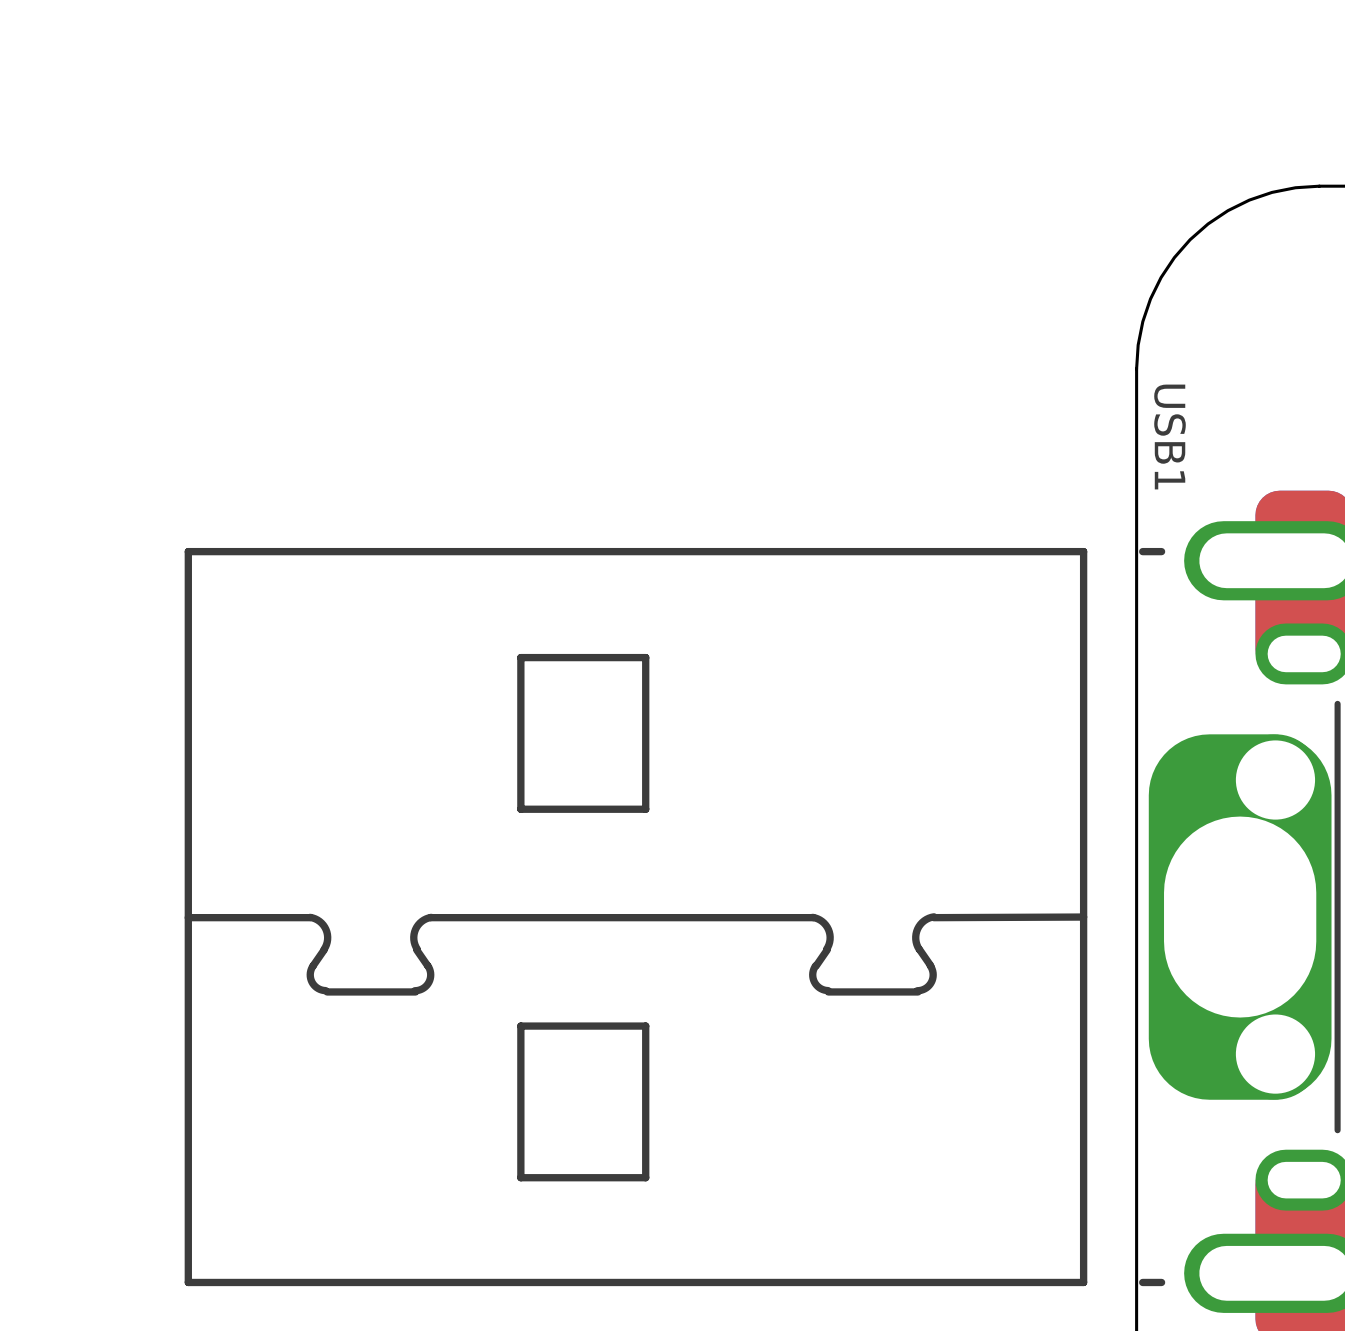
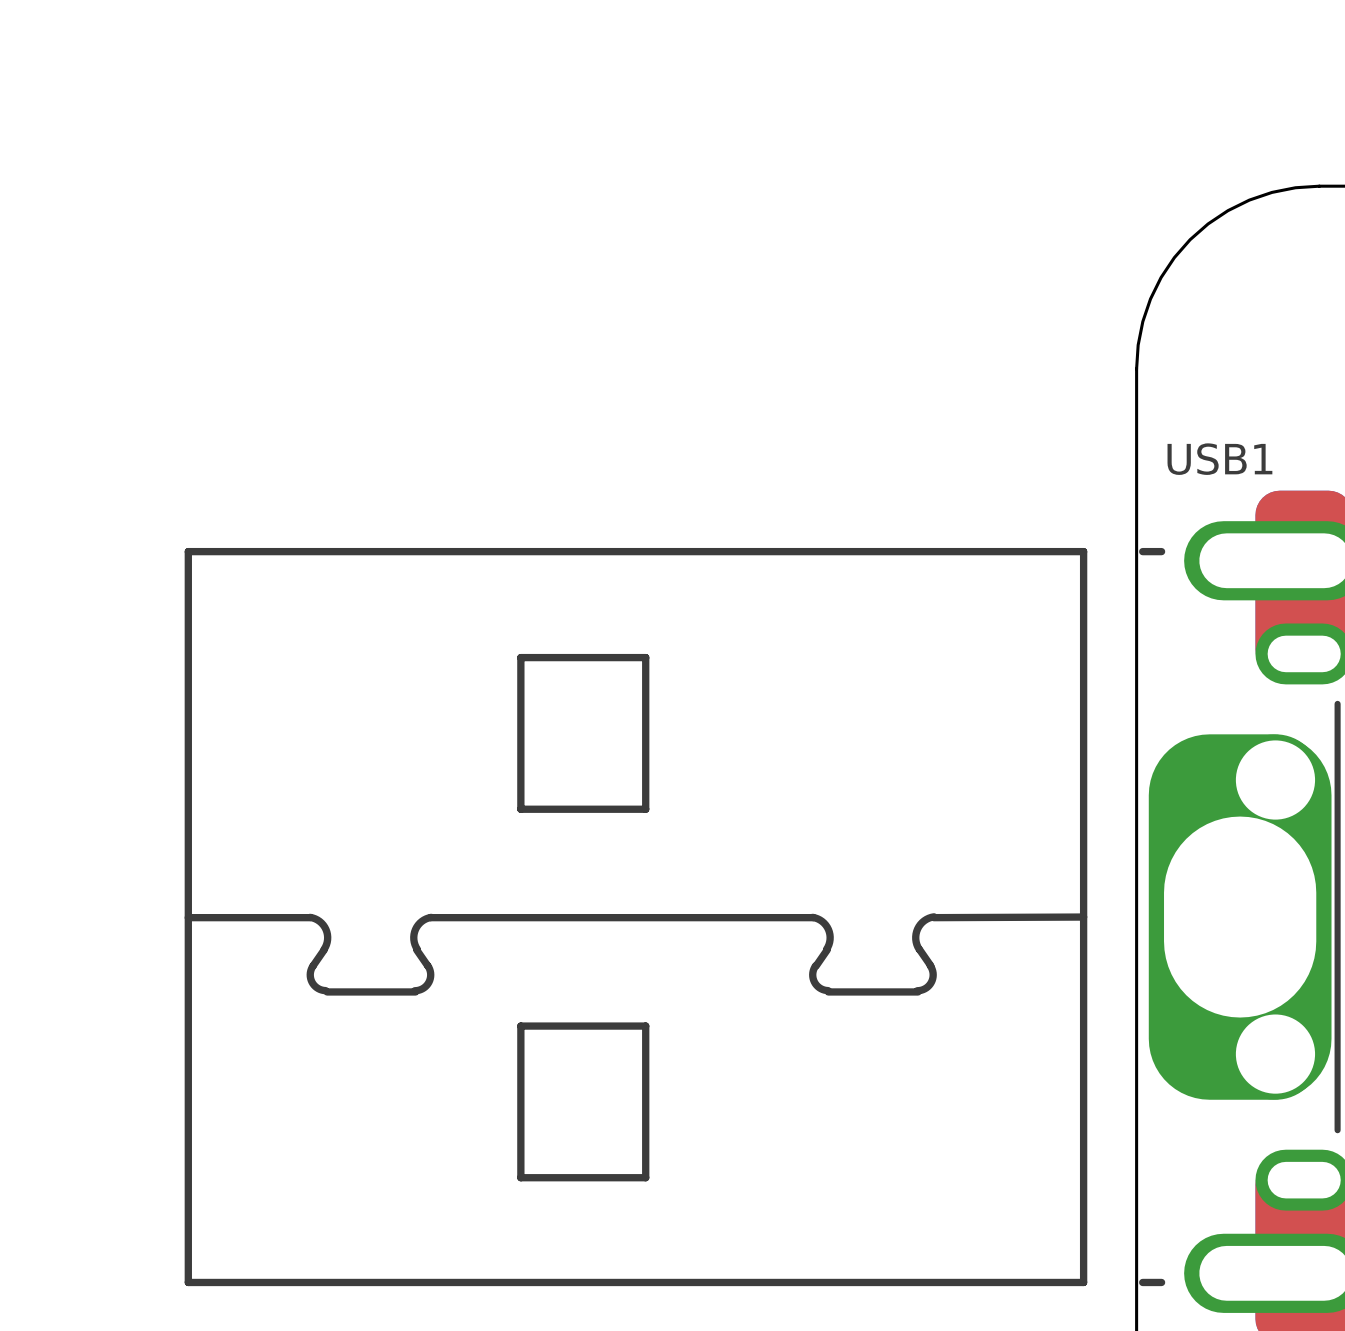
USB1 name rotation: 0° (1170, 437) -> 90° counterclockwise (1219, 459)

